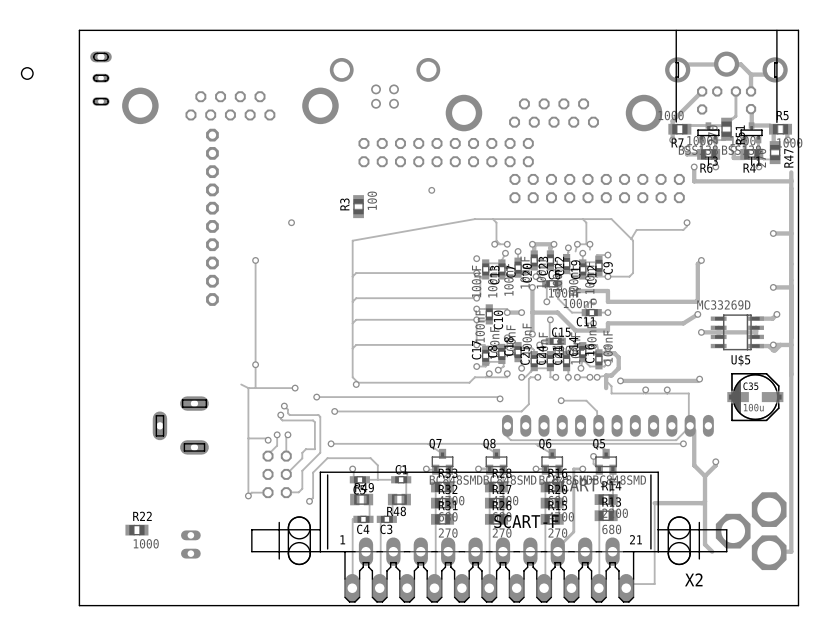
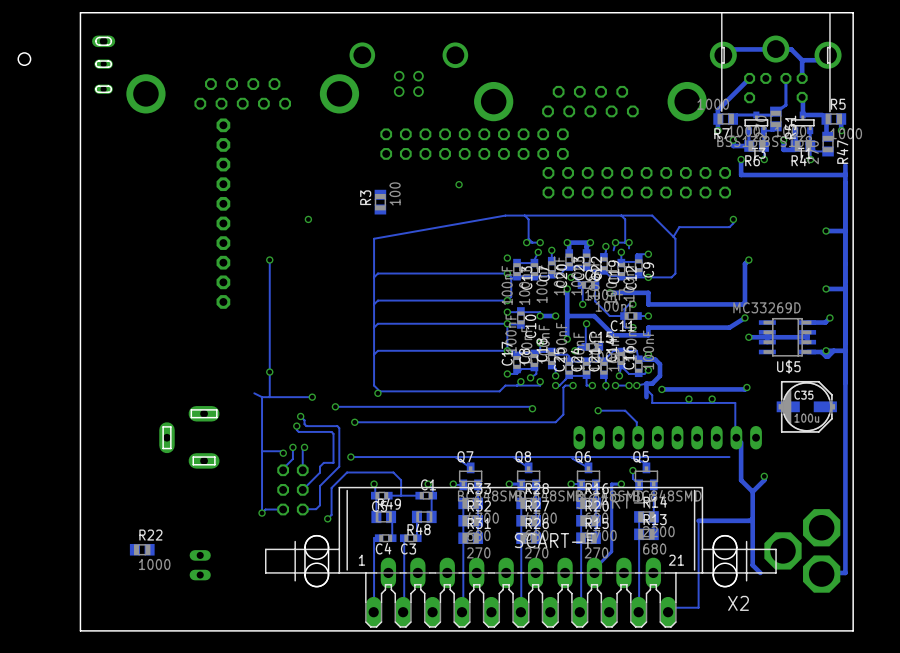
part: (607, 425) -> none
part: none -> (667, 437)
track: (690, 425) (676, 440) (510, 440) (507, 436) (507, 425) -> none
via: (683, 443) -> none

